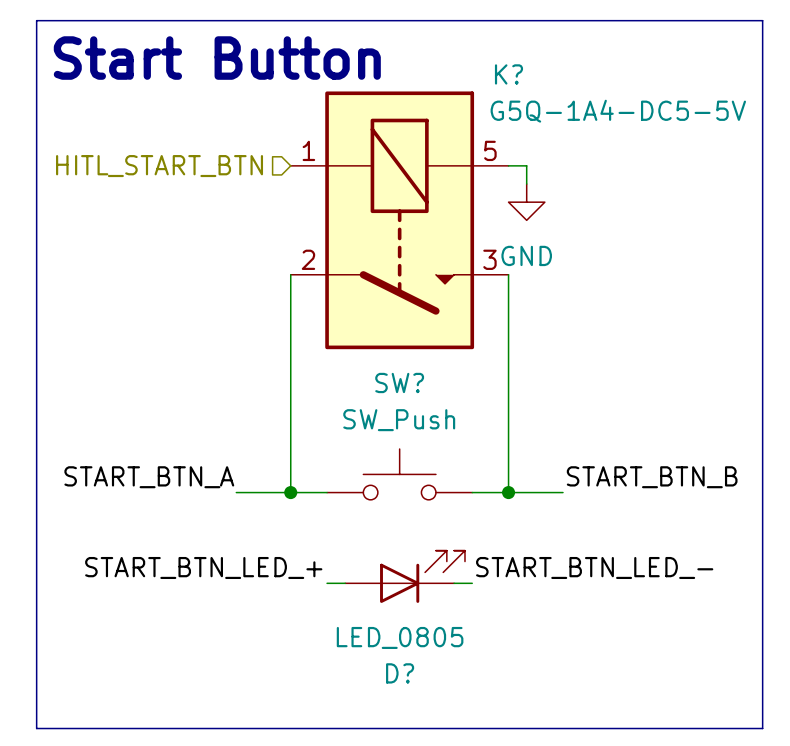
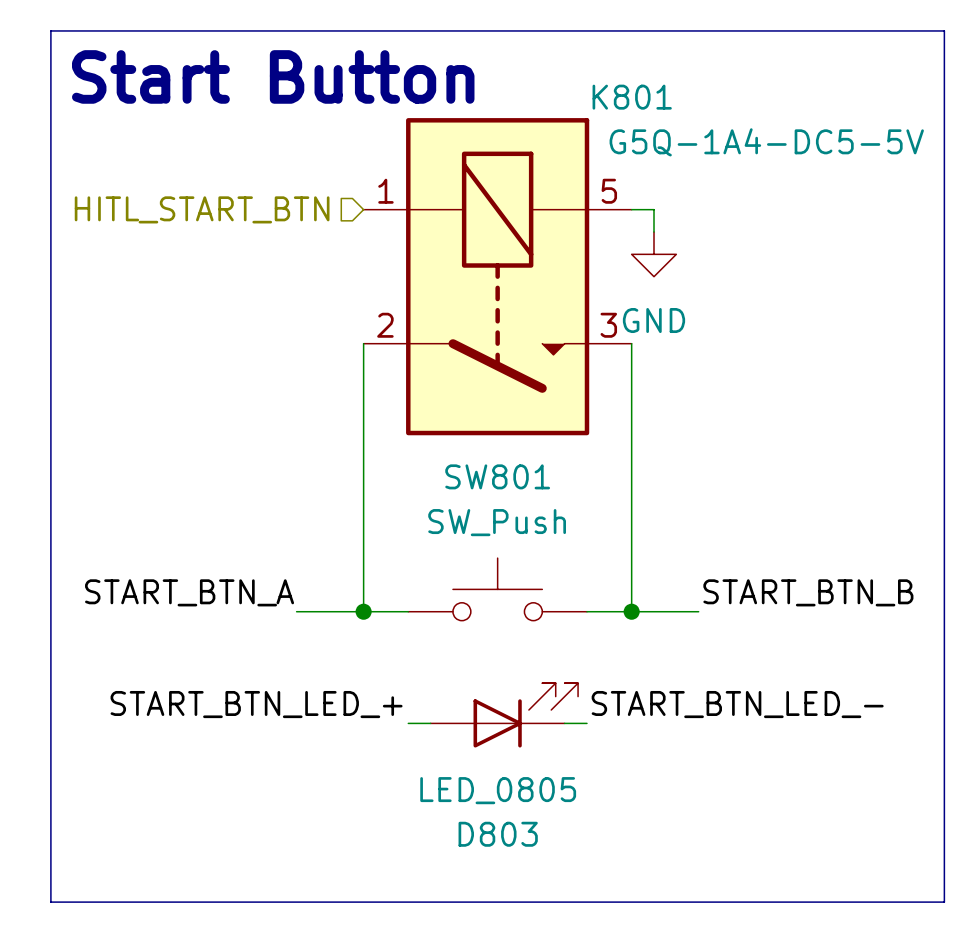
K? name: K? (508, 74) -> K801 (632, 97)
SW? name: SW? (399, 382) -> SW801 (497, 476)
D? name: D? (400, 673) -> D803 (498, 834)

